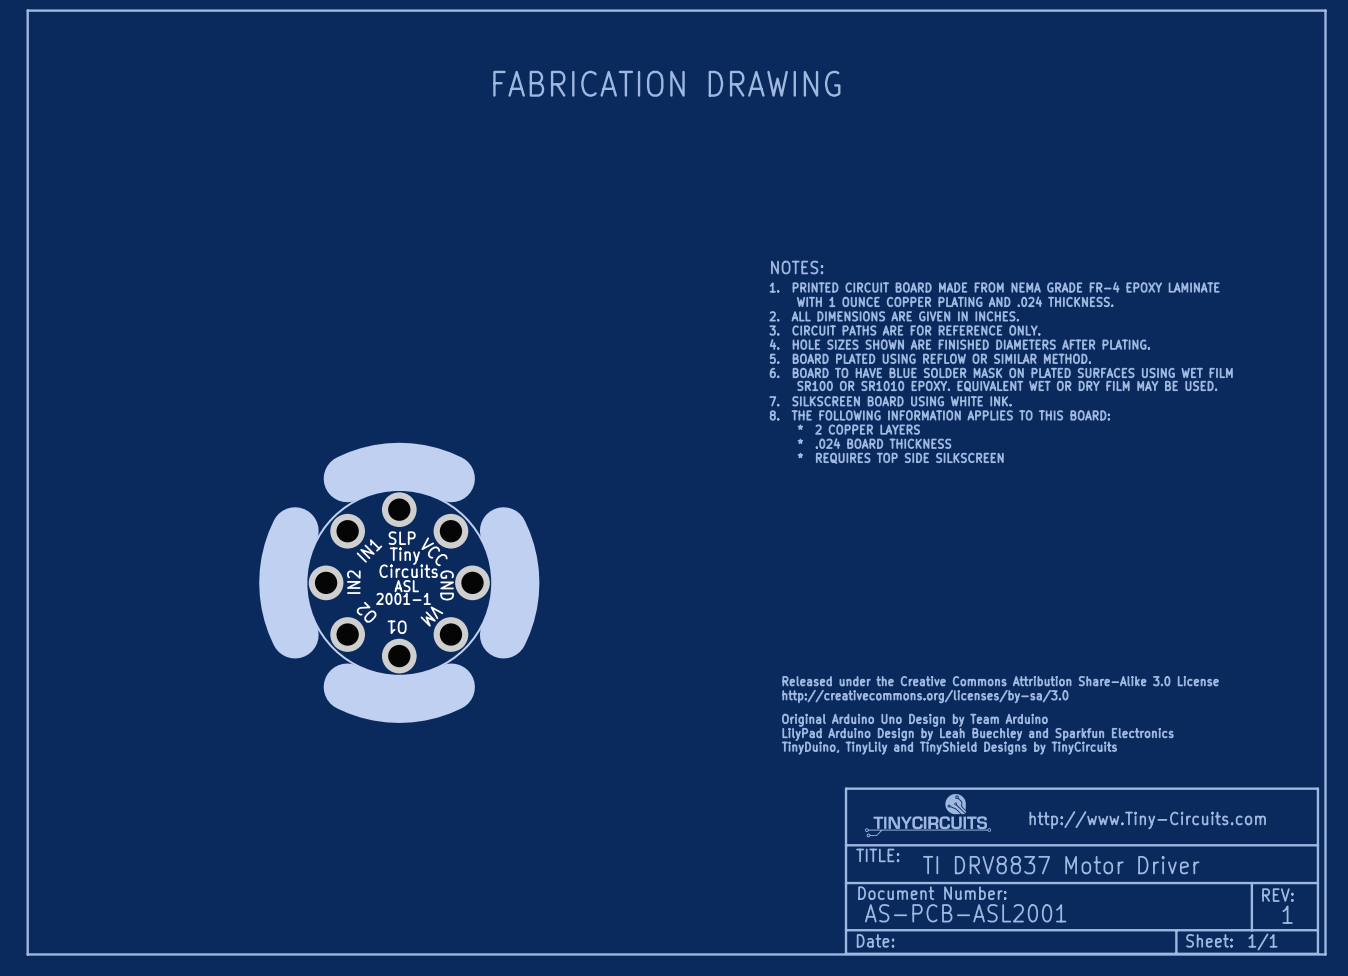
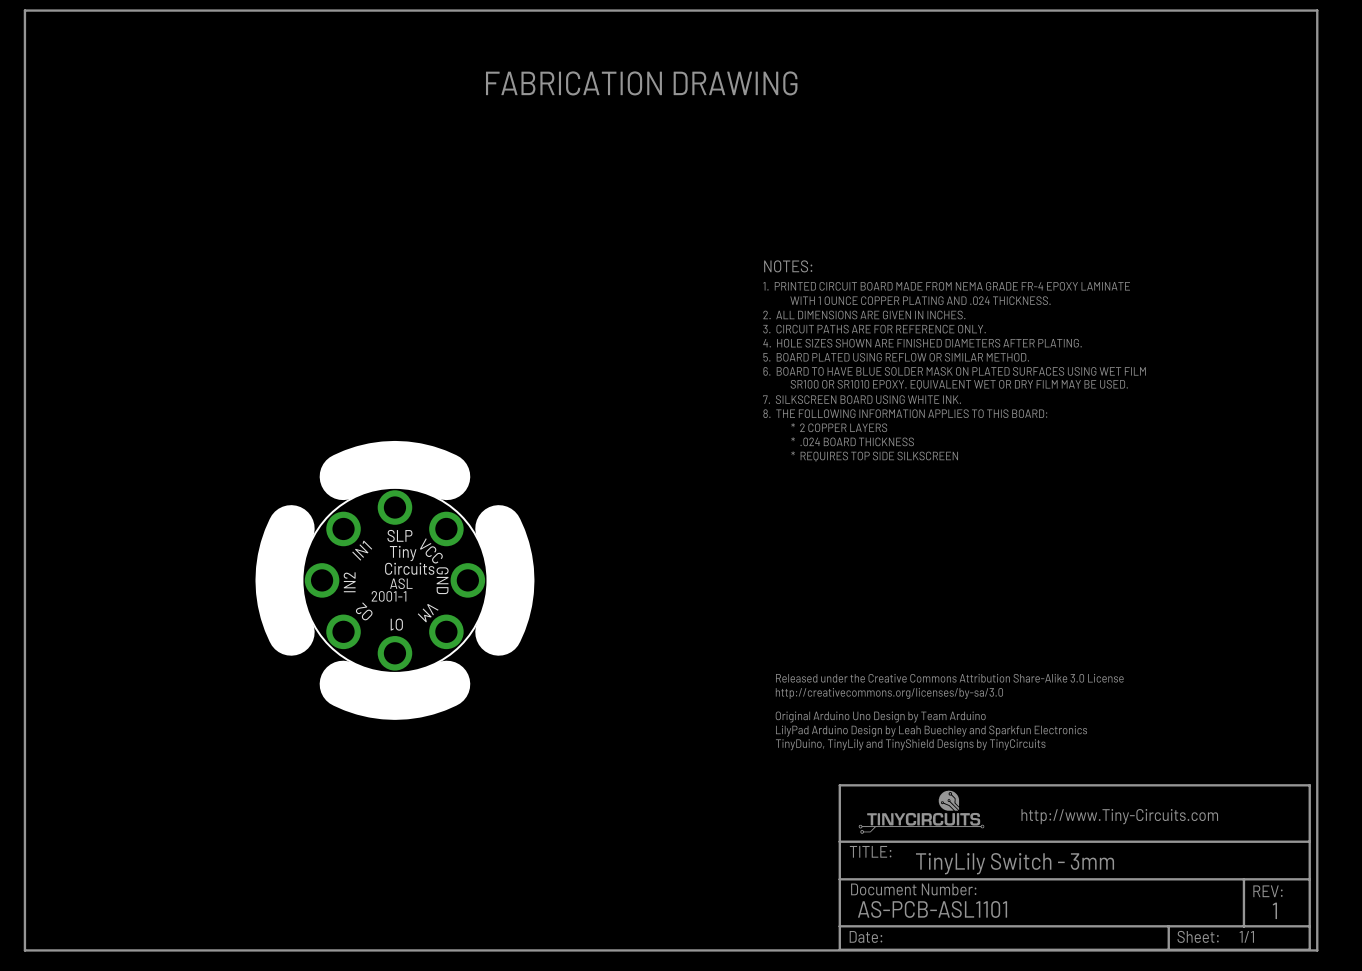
text: TI DRV8837 Motor Driver (1061, 865) -> TinyLily Switch - 3mm (1015, 863)
text: AS-PCB-ASL2001 (965, 913) -> AS-PCB-ASL1101 (932, 909)

